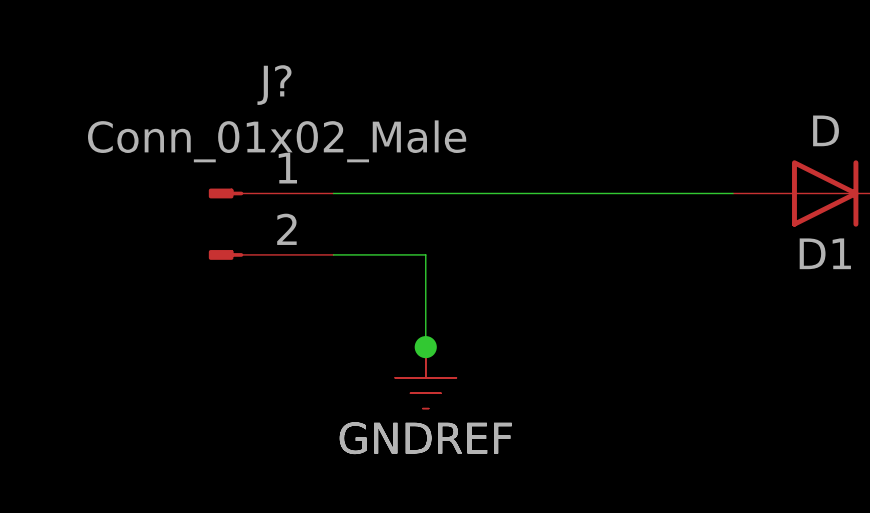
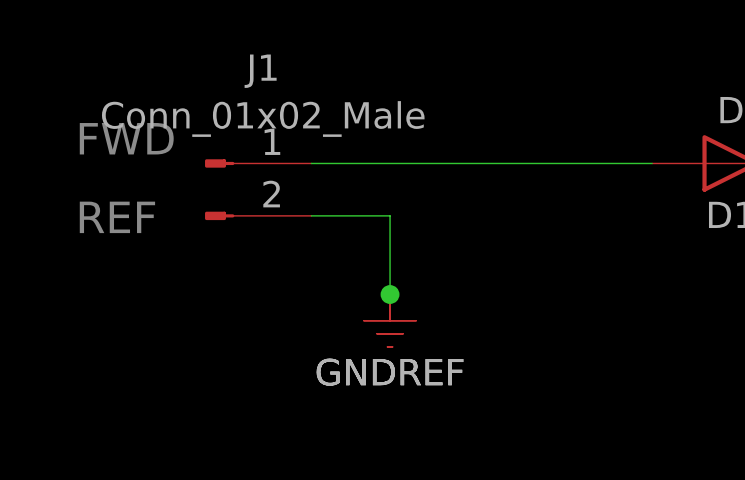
J? name: J? (274, 85) -> J1 (260, 71)
text: none -> FWD (126, 138)
text: none -> REF (117, 217)

